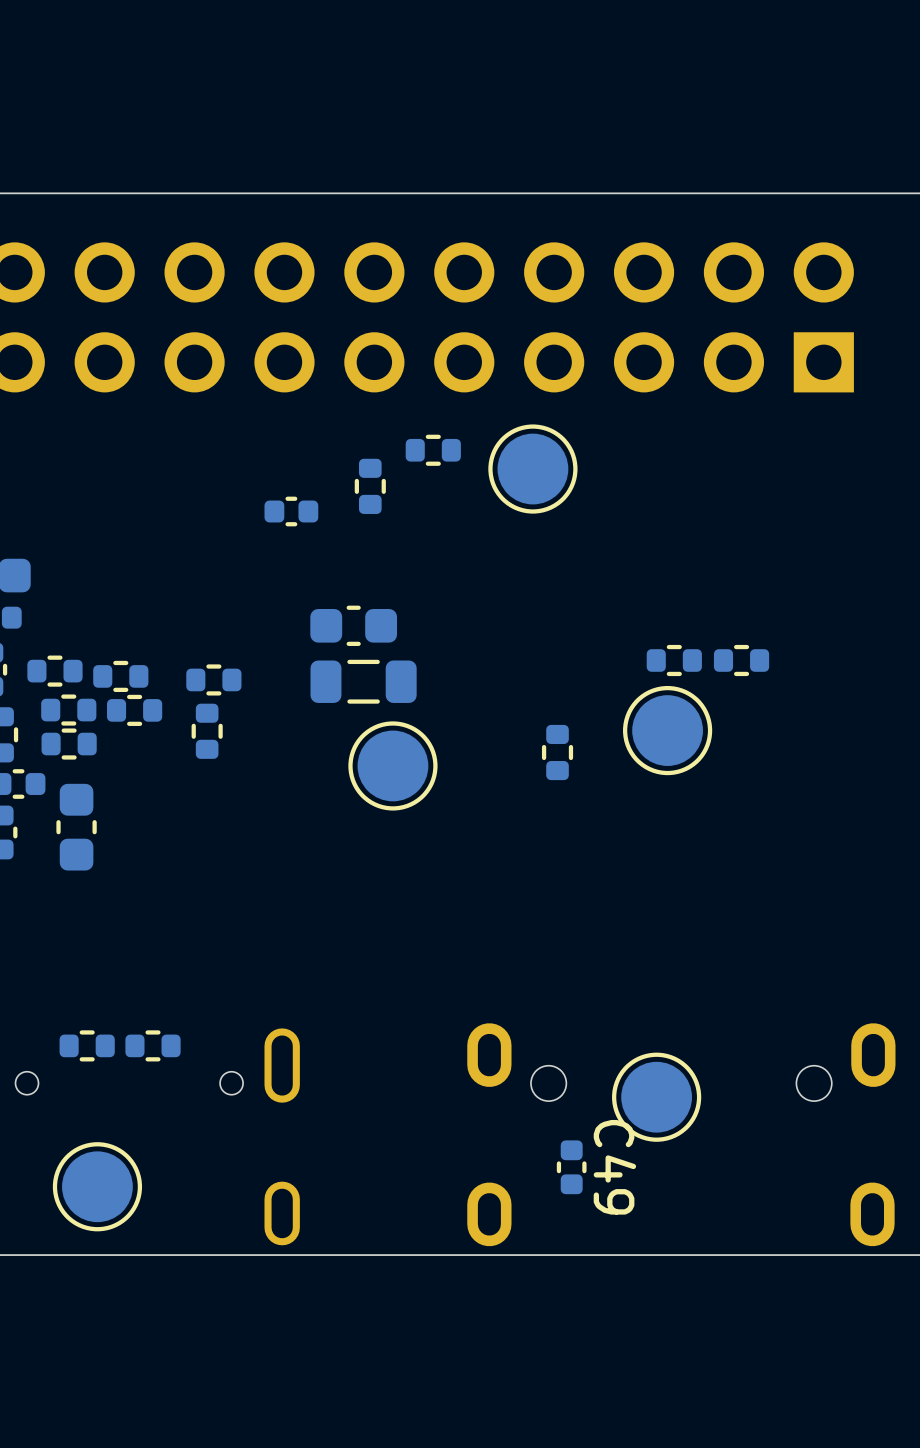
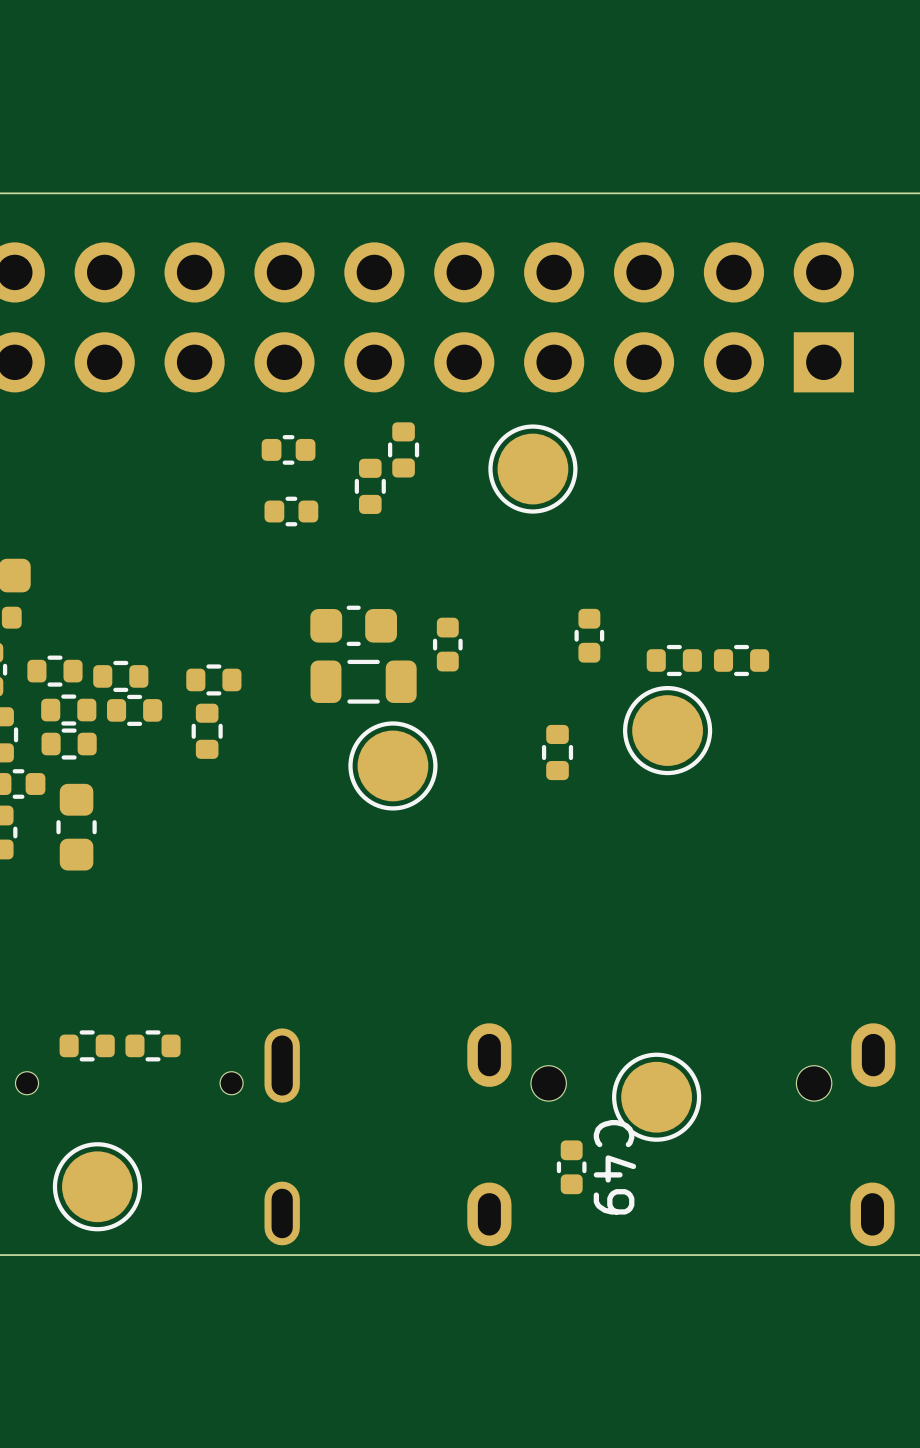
part: none -> (288, 449)
part rotation: 0° (433, 450) -> 90° clockwise (403, 449)
part: none -> (589, 635)
part: none -> (447, 644)

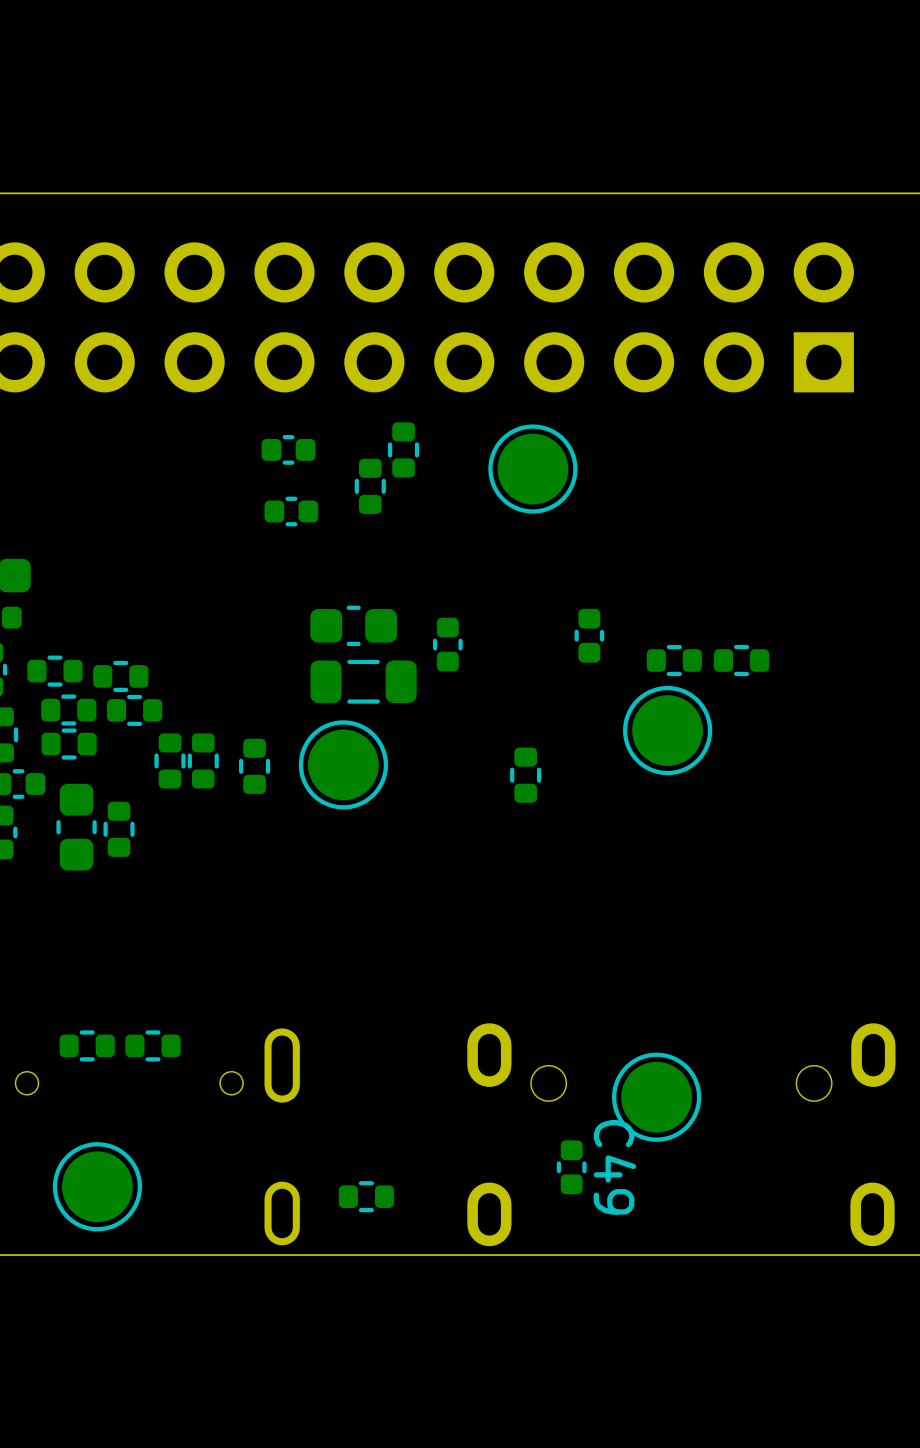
part: (213, 679) -> none
part: (207, 731) -> none
part position: (557, 752) -> (525, 775)
part: none -> (169, 761)
part: none -> (203, 761)
part position: (392, 765) -> (343, 764)
part: none -> (254, 766)
part: none -> (119, 829)
part: none -> (366, 1196)

